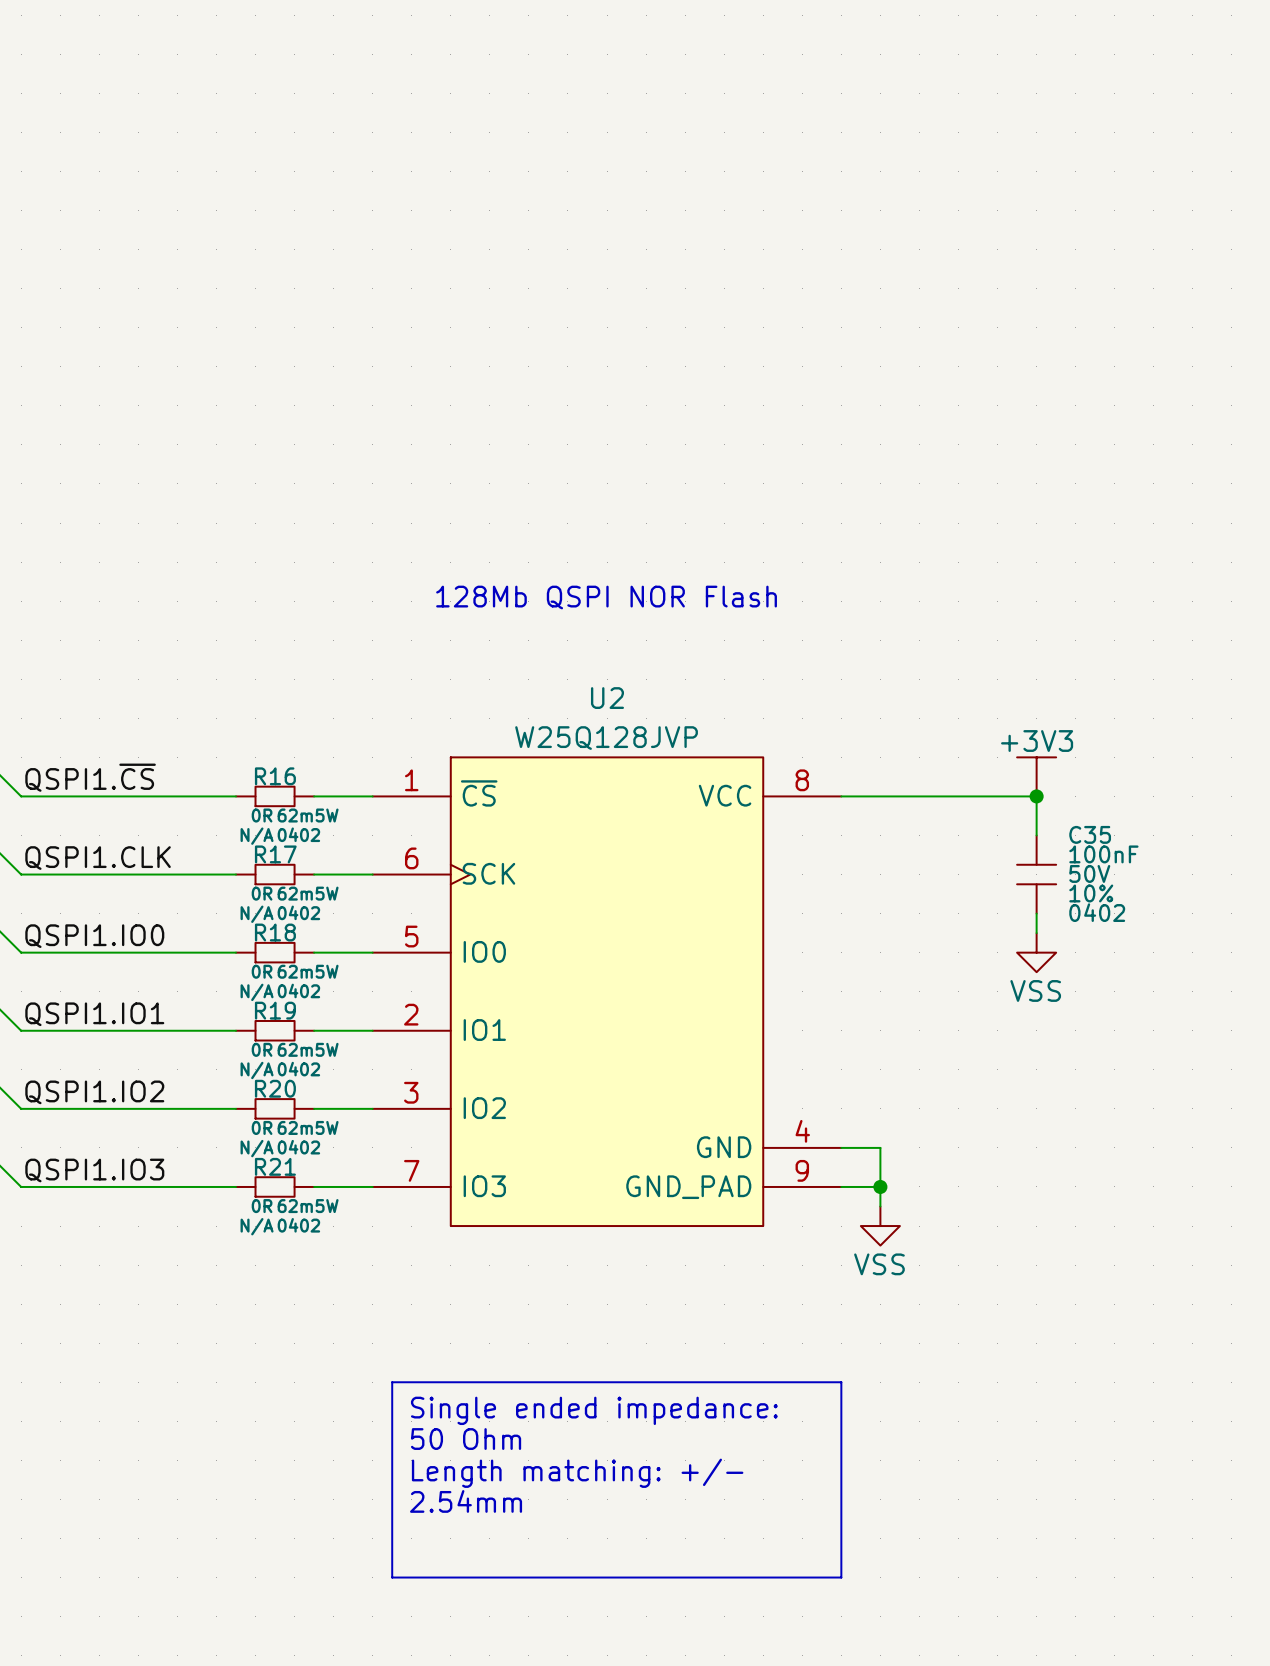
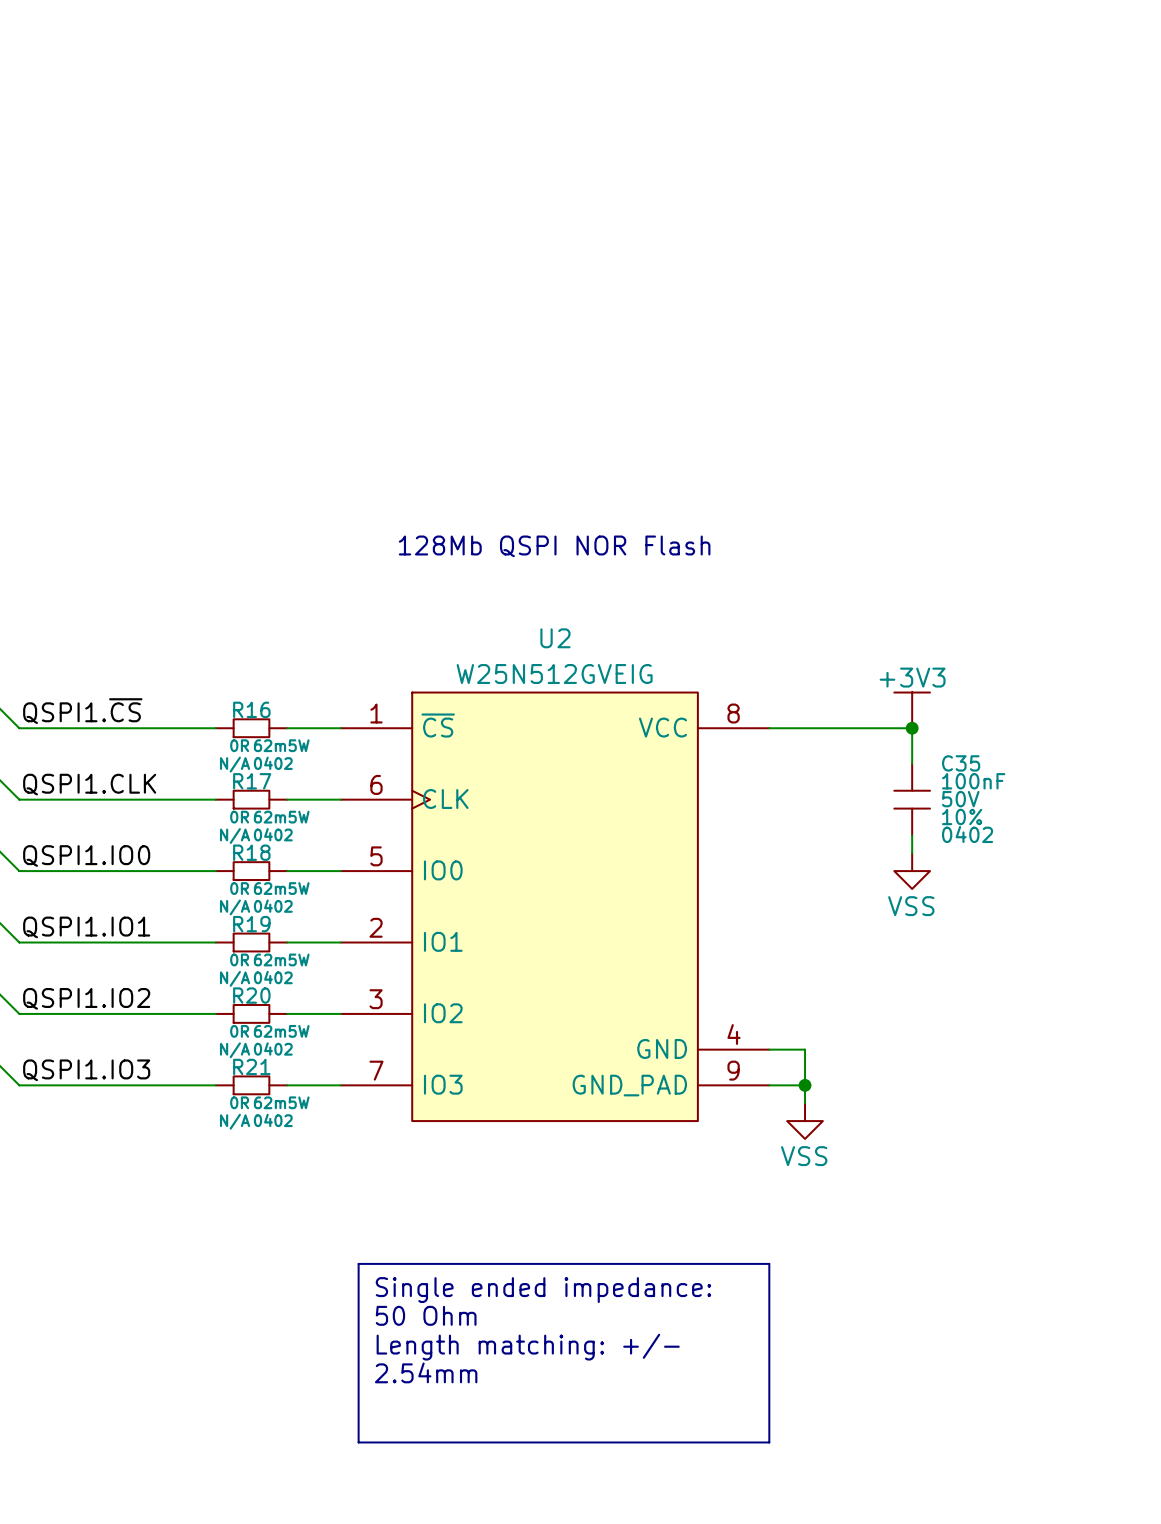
U2 value: W25Q128JVP (606, 738) -> W25N512GVEIG (554, 674)
power symbol position: +3V3 (1036, 776) -> +3V3 (912, 710)
wire: (997, 796) (1036, 796) (1036, 835) -> (912, 728) (912, 763)
junction position: (1036, 796) -> (912, 728)
U2 pin name: SCK (488, 873) -> CLK (445, 798)
C35 position: (1036, 874) -> (912, 799)
wire: (1036, 913) (1036, 933) -> (912, 835) (912, 853)
power symbol position: VSS (1036, 952) -> VSS (912, 871)

